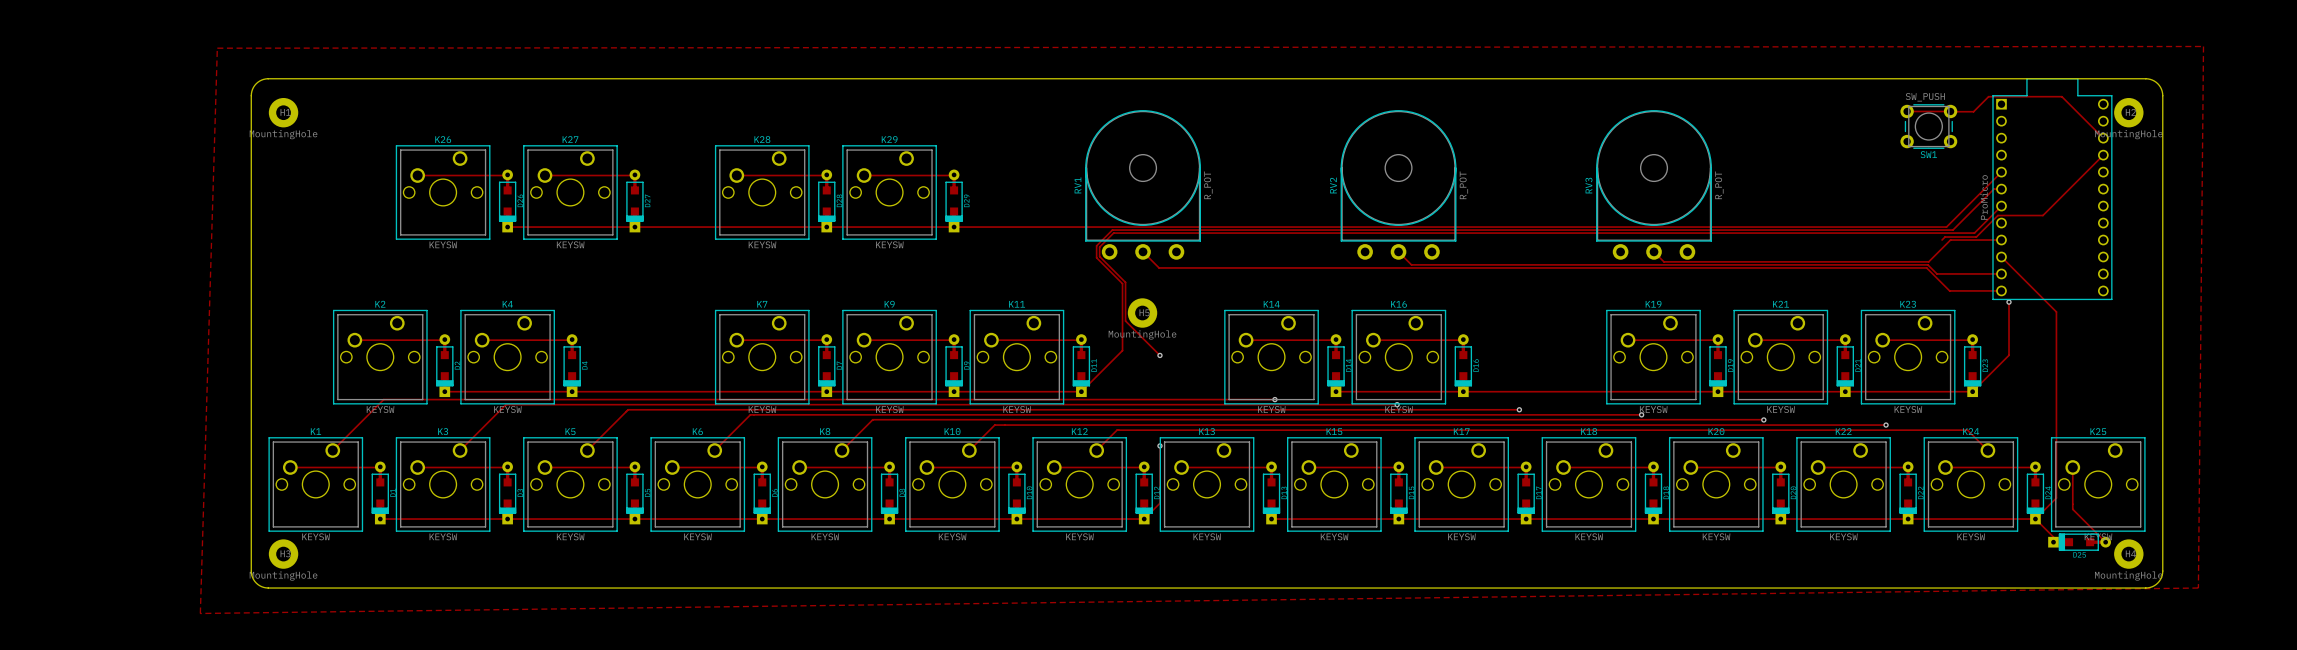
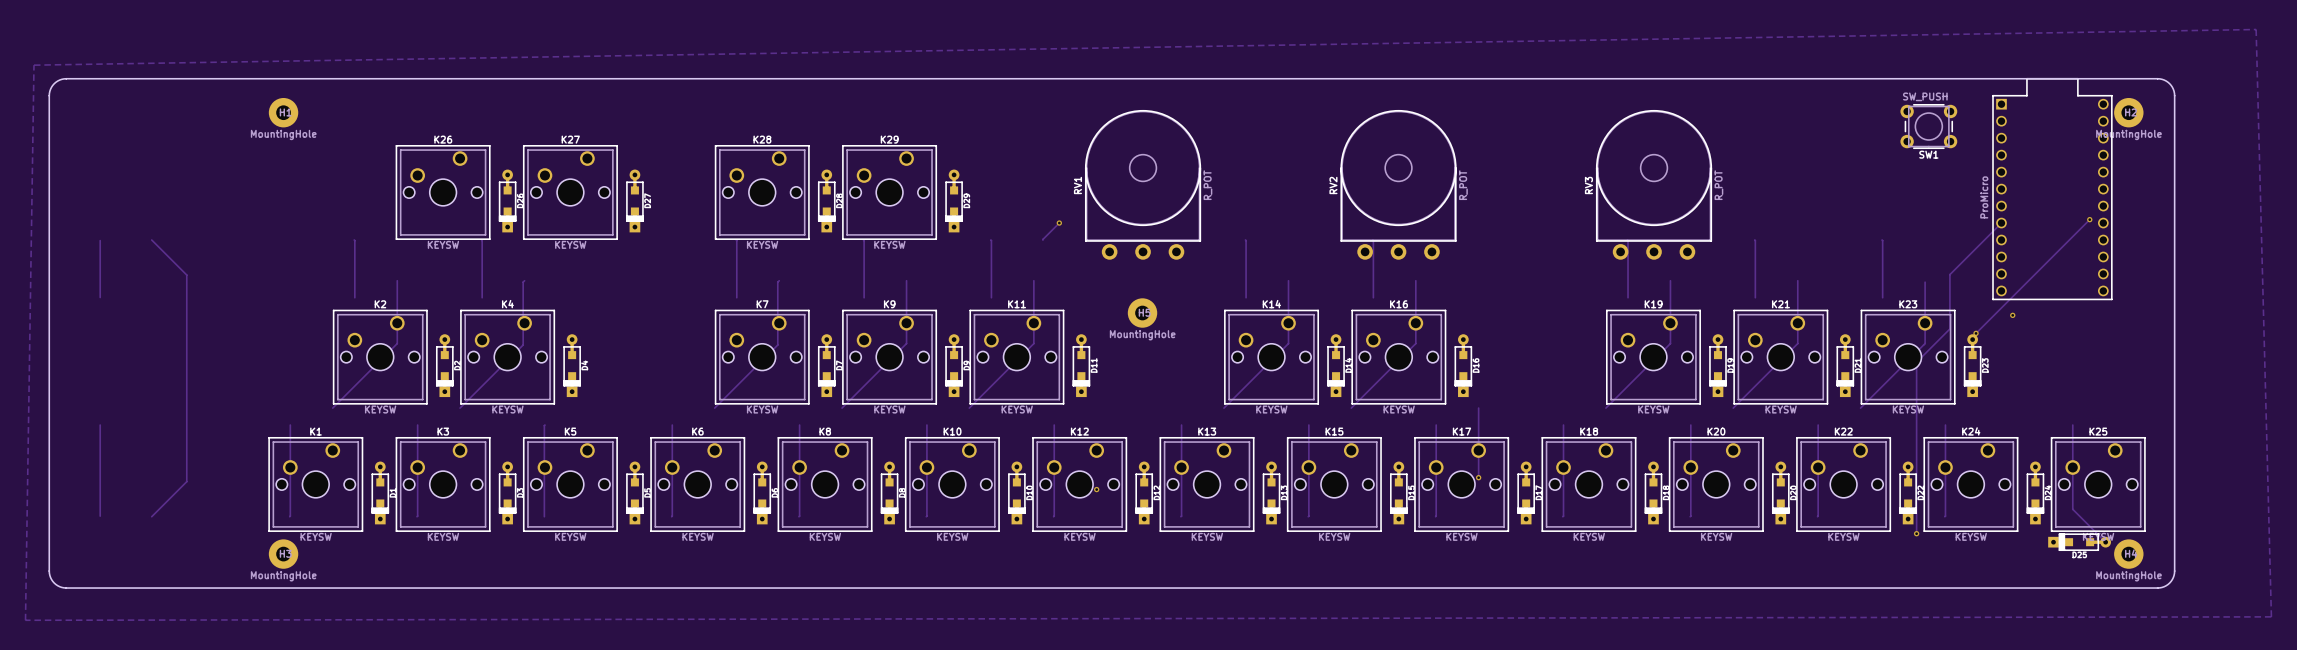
zone outline: (2203, 46) (217, 48) (200, 613) (2198, 588) (2203, 46) -> (2256, 29) (33, 65) (25, 620) (2271, 616) (2256, 29)
board edge: (268, 78) (256, 83) (251, 95) (251, 571) (256, 583) (268, 588) -> (268, 78) (64, 78) (54, 83) (49, 95) (50, 577) (57, 585) (66, 588) (268, 588)
board edge: (2145, 78) (2157, 83) (2162, 95) (2162, 571) (2157, 583) (2145, 588) -> (2145, 78) (2166, 81) (2172, 87) (2174, 95) (2174, 571) (2172, 579) (2166, 585) (2145, 588)
track: (1907, 111) (1973, 111) (1988, 96) (2061, 96) (2103, 138) -> none
track: (2103, 155) (2042, 215) (1997, 215) (1976, 237) (1945, 237) (1942, 240) -> none
track: (2001, 172) (1946, 227) (507, 227) -> none
track: (507, 174) (417, 175) -> none
track: (634, 174) (544, 175) -> none
track: (826, 174) (736, 175) -> none
track: (954, 174) (864, 175) -> none
track: (2001, 189) (1993, 189) (1952, 230) (1112, 230) (1096, 245) (1096, 257) (1122, 283) (1122, 350) (1081, 391) (444, 391) -> none
track: (2001, 206) (1974, 233) (1113, 233) (1099, 247) (1099, 256) (1125, 282) (1125, 321) (1159, 355) -> none
track: none -> (2089, 219) (1976, 331)
via: none -> (2089, 219)
track: none -> (1059, 223) (1042, 240)
via: none -> (1059, 223)
track: none -> (2001, 223) (1949, 274) (1949, 328) (1916, 362) (1916, 533)
track: none -> (100, 240) (100, 297)
track: none -> (151, 240) (186, 275) (186, 481) (151, 516)
track: none -> (354, 240) (354, 297)
track: none -> (481, 240) (482, 297)
track: none -> (736, 240) (736, 297)
track: none -> (863, 240) (864, 297)
track: none -> (990, 240) (991, 297)
track: none -> (1245, 240) (1246, 297)
track: none -> (1372, 240) (1373, 297)
track: none -> (1627, 240) (1628, 297)
track: none -> (1754, 240) (1755, 297)
track: none -> (1882, 240) (1882, 297)
track: (2001, 240) (1950, 240) (1928, 261) (1664, 261) (1654, 251) -> none
track: (1143, 251) (1159, 267) (1926, 267) (1949, 290) (2001, 290) -> none
track: (1398, 251) (1411, 264) (1927, 264) (1936, 273) (2001, 273) -> none
track: (2001, 256) (2056, 311) (2056, 498) (2035, 519) -> none
track: none -> (397, 280) (397, 343) (332, 408)
track: none -> (524, 280) (523, 345) (460, 408)
track: none -> (779, 280) (777, 345) (714, 408)
track: none -> (906, 280) (906, 343) (842, 408)
track: none -> (1033, 280) (1033, 343) (969, 408)
track: none -> (1288, 280) (1288, 343) (1224, 408)
track: none -> (1415, 280) (1415, 343) (1351, 408)
track: none -> (1670, 280) (1670, 343) (1605, 408)
track: none -> (1797, 280) (1797, 343) (1733, 408)
track: none -> (1925, 282) (1925, 343) (1860, 408)
track: (2009, 302) (2009, 355) (1972, 391) (1336, 391) -> none
via position: (2009, 302) -> (2012, 315)
via: none -> (1976, 333)
track: (444, 339) (354, 340) -> none
track: (572, 339) (482, 340) -> none
track: (826, 339) (736, 340) -> none
track: (954, 339) (864, 340) -> none
track: (1081, 339) (991, 340) -> none
track: (1336, 339) (1246, 340) -> none
track: (1463, 339) (1373, 340) -> none
track: (1717, 339) (1628, 340) -> none
track: (1845, 339) (1755, 340) -> none
track: (1972, 339) (1882, 340) -> none
via: (1159, 355) -> none
track: (1274, 399) (383, 399) (332, 450) -> none
via: (1274, 399) -> none
track: (1397, 404) (505, 404) (460, 450) -> none
via: (1397, 404) -> none
track: none -> (1478, 408) (1478, 477)
track: (1519, 409) (628, 409) (587, 450) -> none
via: (1519, 409) -> none
track: (1641, 414) (750, 414) (714, 450) -> none
via: (1641, 414) -> none
via: (1763, 419) -> none
track: (1764, 419) (872, 419) (842, 450) -> none
track: none -> (100, 425) (100, 516)
track: none -> (290, 425) (289, 516)
track: none -> (417, 425) (417, 516)
track: none -> (544, 425) (544, 516)
track: none -> (672, 425) (671, 516)
track: none -> (799, 425) (799, 516)
track: none -> (926, 425) (926, 516)
track: none -> (1054, 425) (1053, 516)
track: none -> (1181, 425) (1180, 516)
track: none -> (1308, 425) (1308, 516)
track: none -> (1436, 425) (1435, 516)
track: none -> (1563, 425) (1562, 516)
track: none -> (1690, 425) (1690, 516)
track: none -> (1818, 425) (1817, 516)
track: (1884, 425) (994, 425) (969, 450) -> none
via: (1886, 425) -> none
track: none -> (1945, 425) (1944, 516)
track: none -> (2072, 425) (2072, 467)
track: (1159, 445) (1159, 503) (1144, 519) (380, 519) -> none
via: (1159, 445) -> none
track: (1096, 450) (1117, 430) (1967, 430) (1987, 450) -> none
track: (380, 466) (290, 467) -> none
track: (507, 466) (417, 467) -> none
track: (634, 466) (544, 467) -> none
track: (762, 466) (672, 467) -> none
track: (889, 466) (799, 467) -> none
track: (1016, 466) (926, 467) -> none
track: (1144, 466) (1054, 467) -> none
track: (1271, 466) (1181, 467) -> none
track: (1398, 466) (1308, 467) -> none
track: (1526, 466) (1436, 467) -> none
track: (1653, 466) (1563, 467) -> none
track: (1780, 466) (1690, 467) -> none
track: (1908, 466) (1818, 467) -> none
track: (2035, 466) (1945, 467) -> none
via: none -> (1478, 477)
via: none -> (1096, 489)
track: (1271, 519) (2035, 519) -> none
track: (2035, 519) (2053, 537) (2053, 542) -> none
via: none -> (1916, 533)

